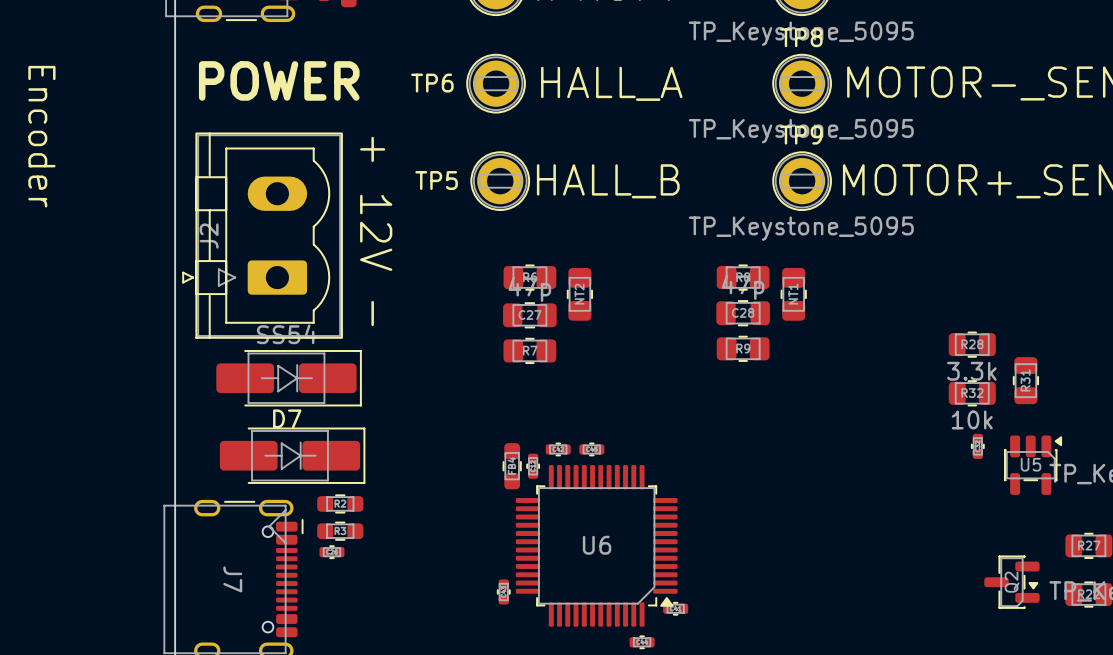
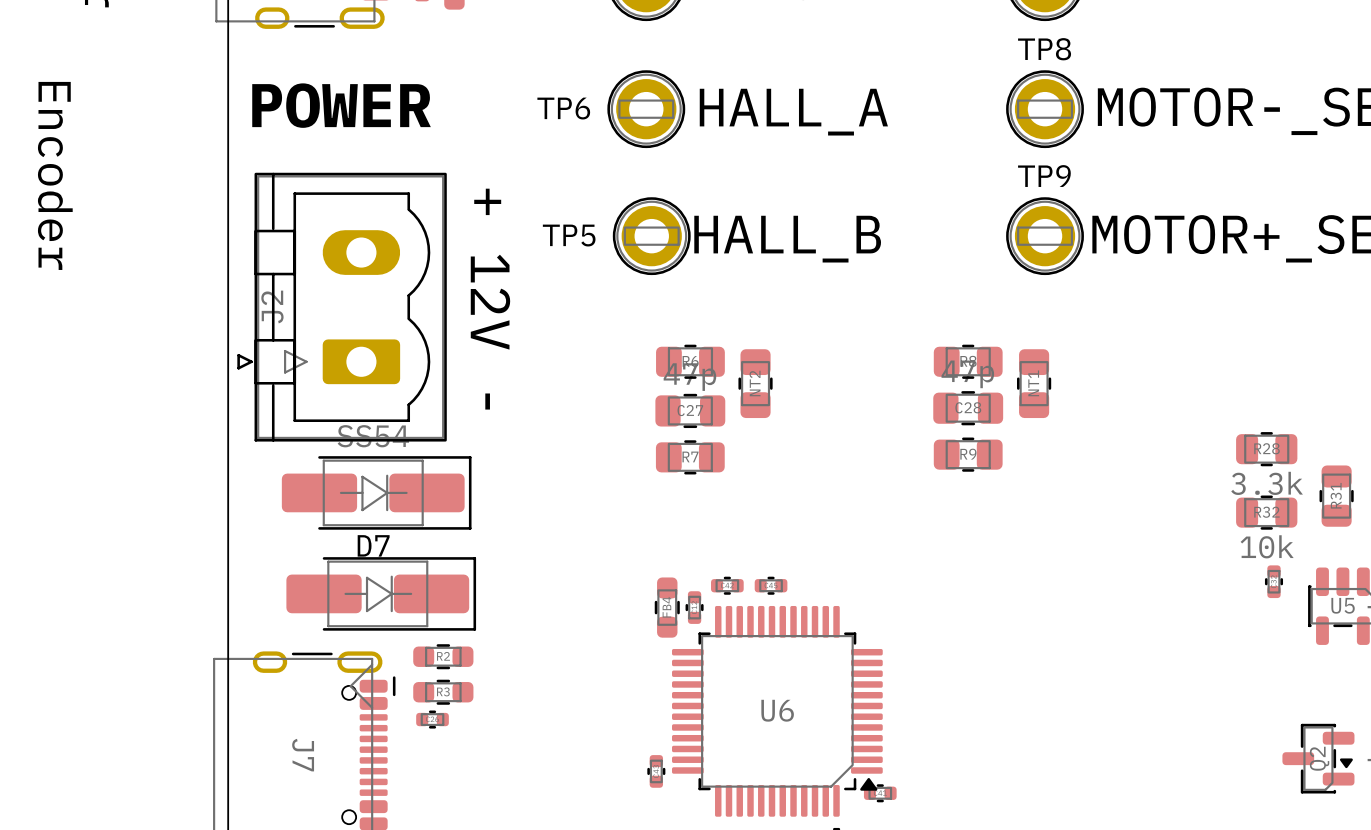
part value: TP_Keystone_5095 (801, 33) -> none
TP8 value: TP_Keystone_5095 (801, 131) -> none
TP9 value: TP_Keystone_5095 (801, 228) -> none

